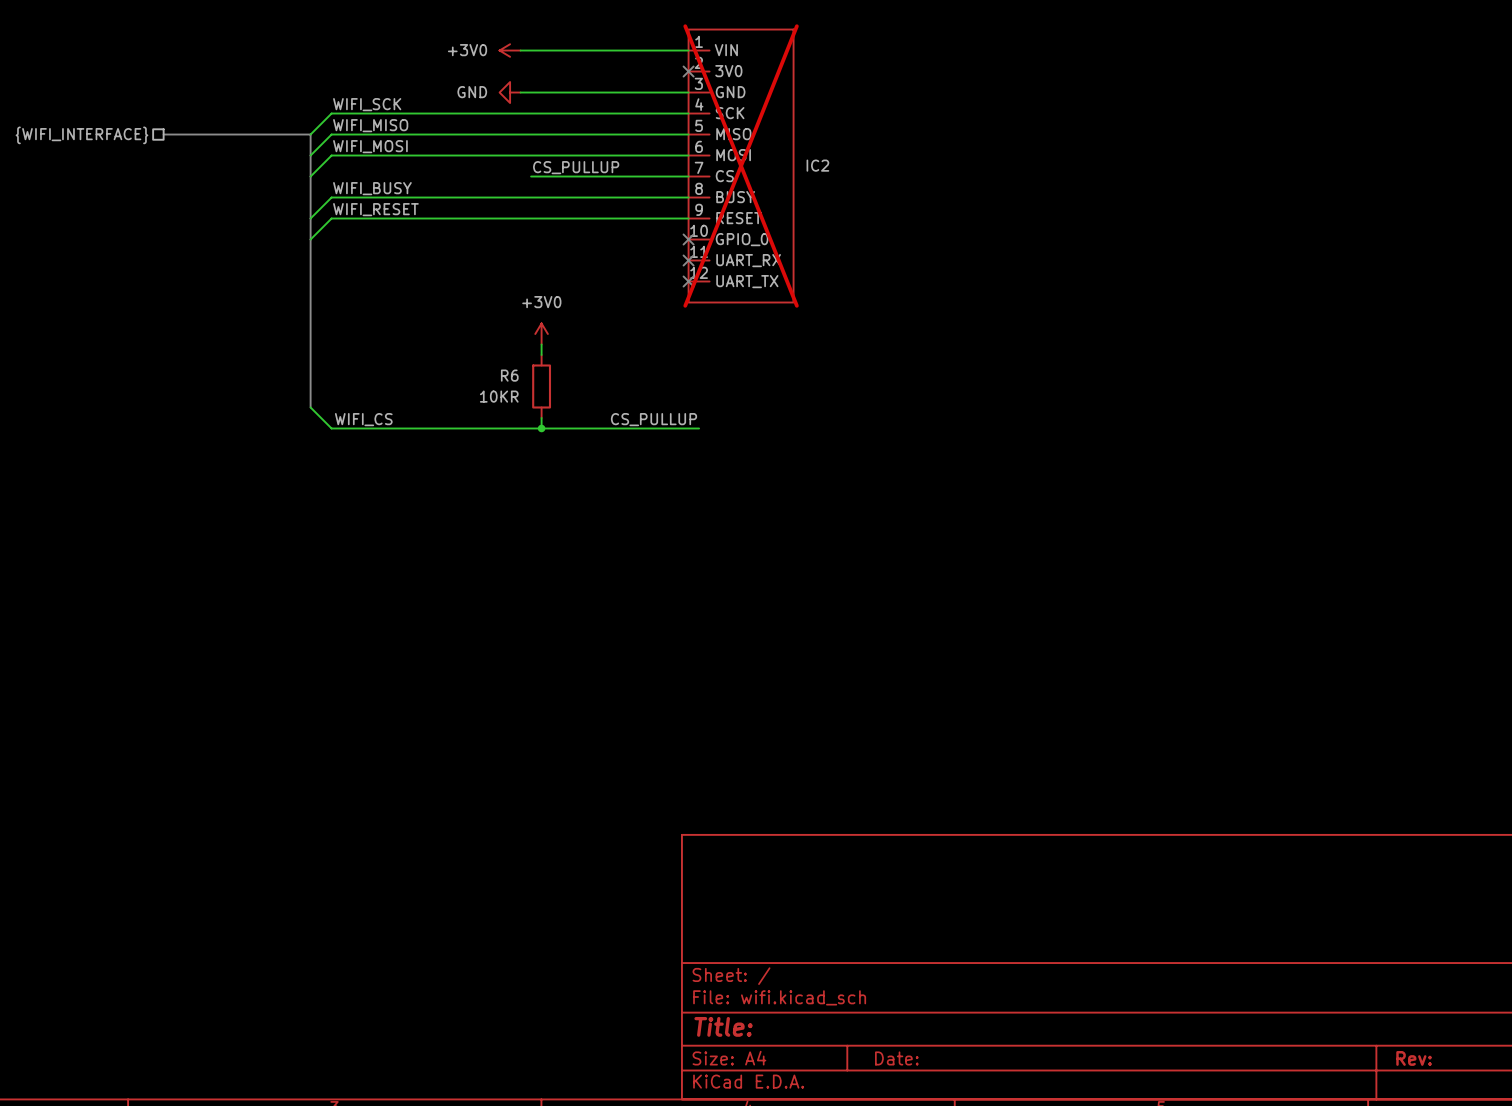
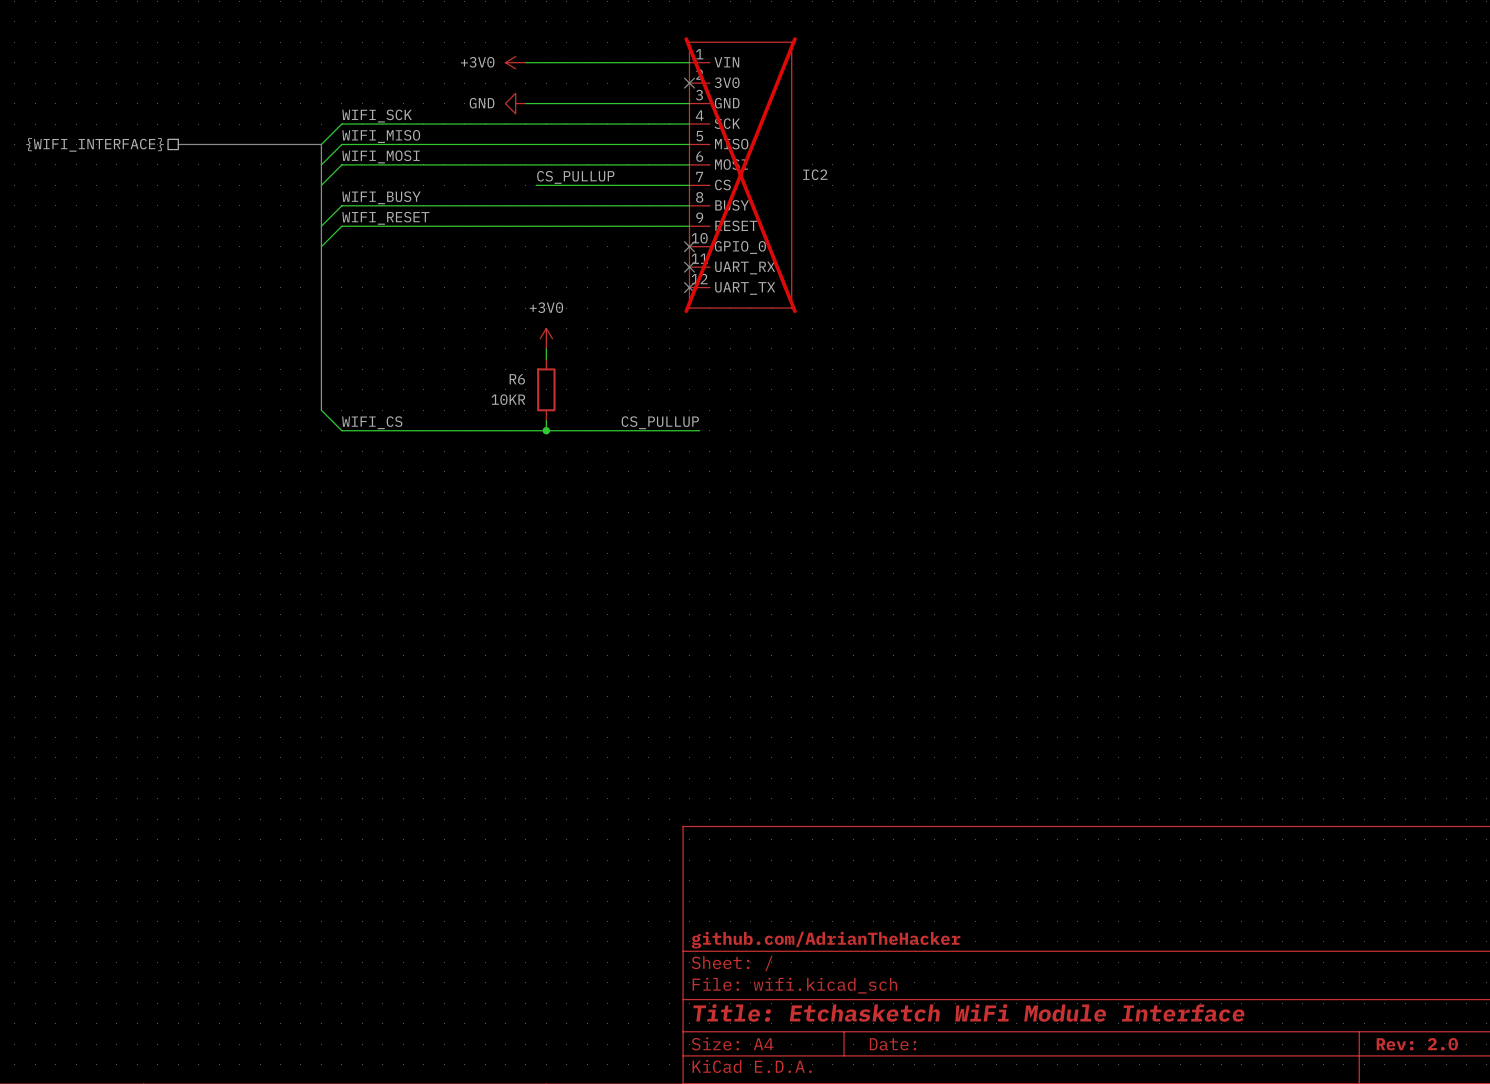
title block: none -> github.com/AdrianTheHacker (826, 940)
title block: Title: (723, 1026) -> Title: Etchasketch WiFi Module Interface (968, 1012)
title block: Rev: (1414, 1058) -> Rev: 2.0 (1417, 1044)

